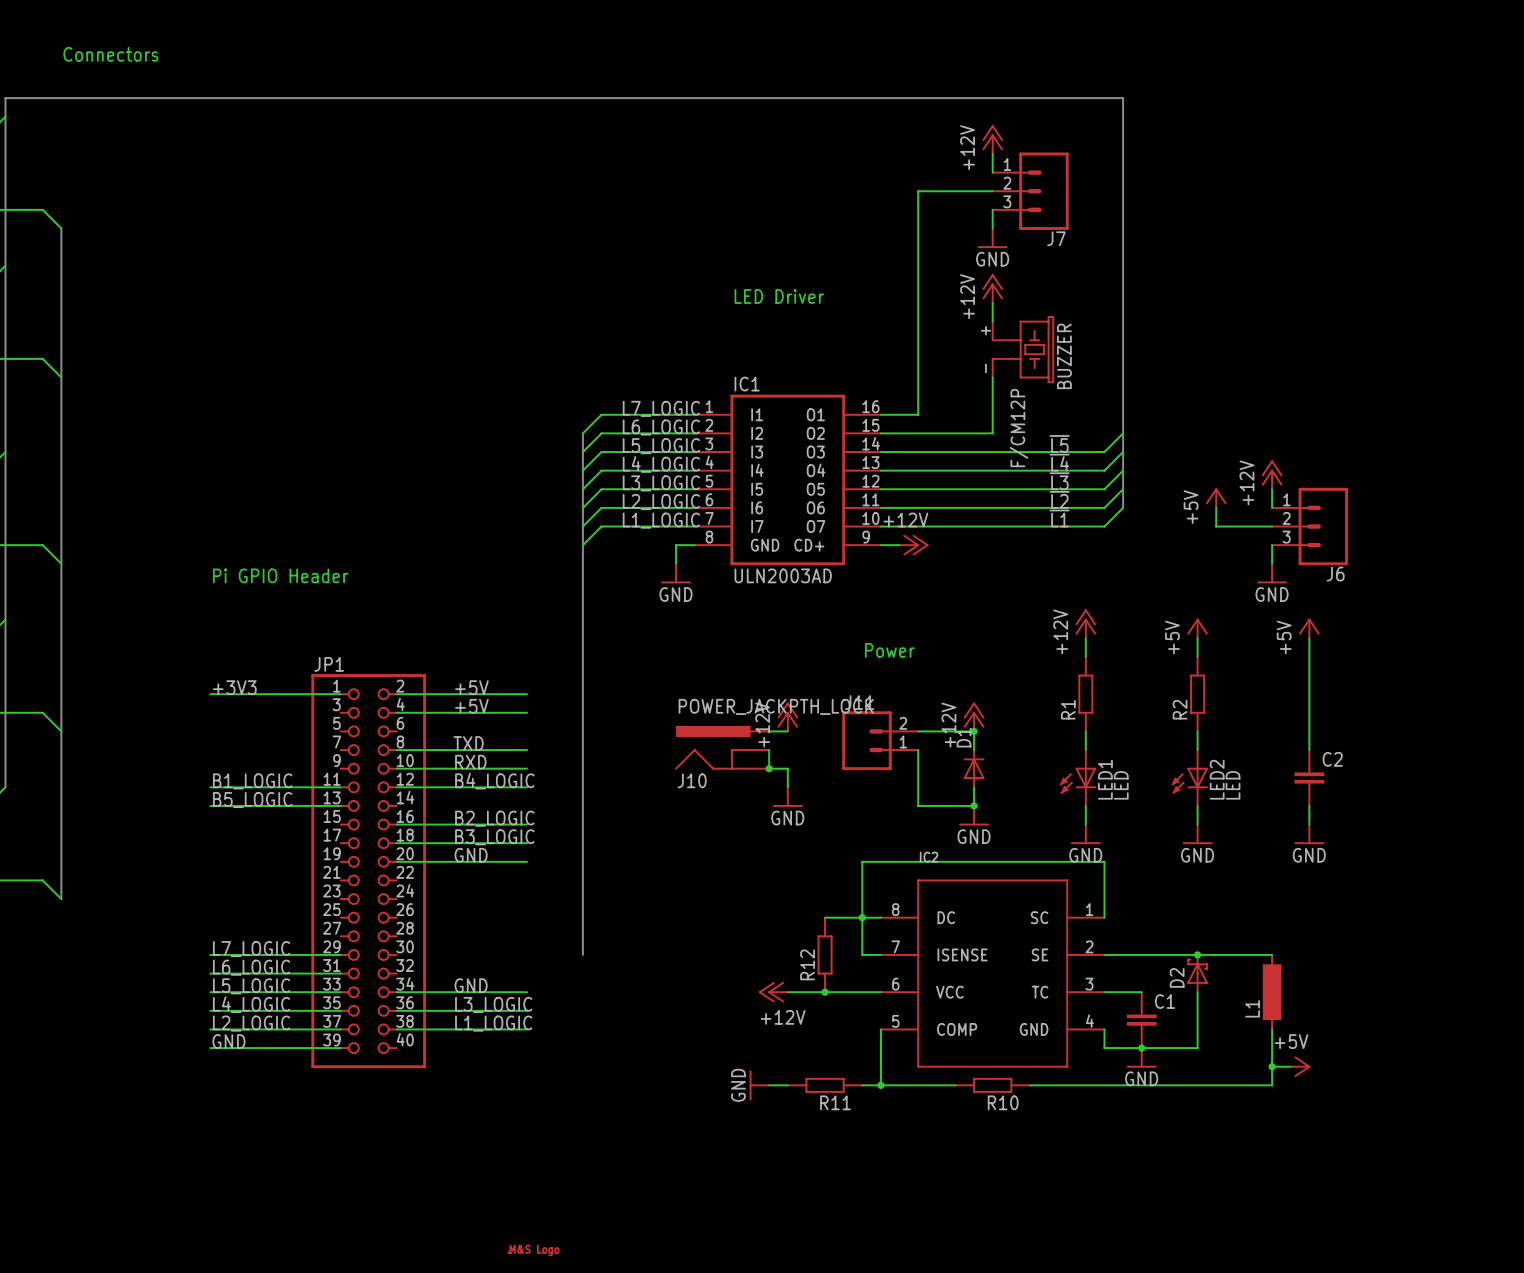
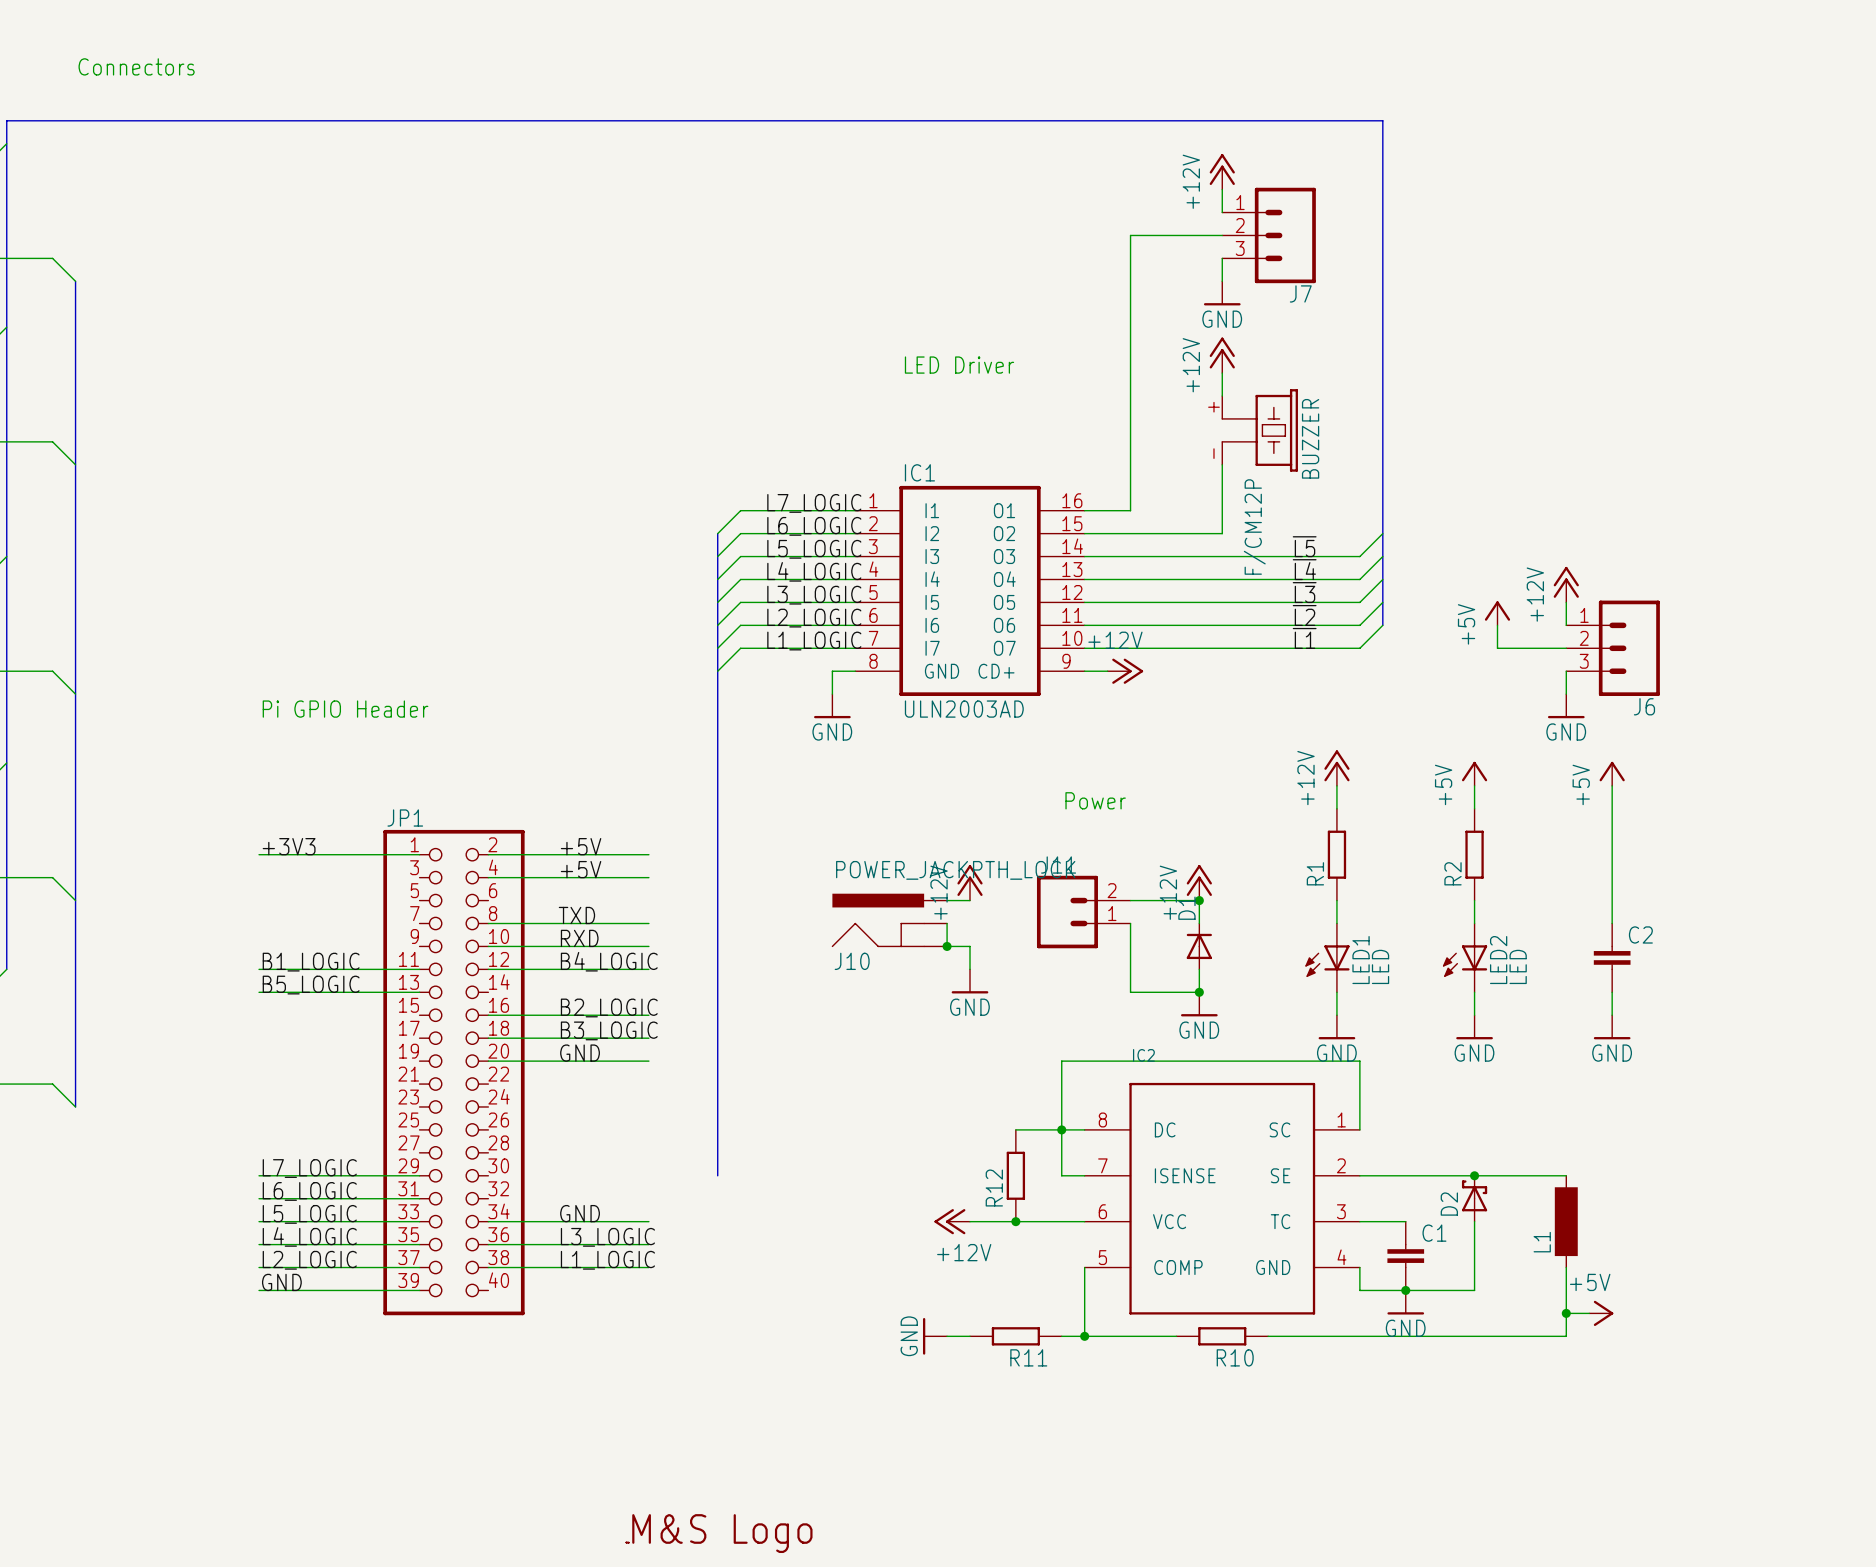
part: none -> (719, 1533)
part: (533, 1250) -> none

